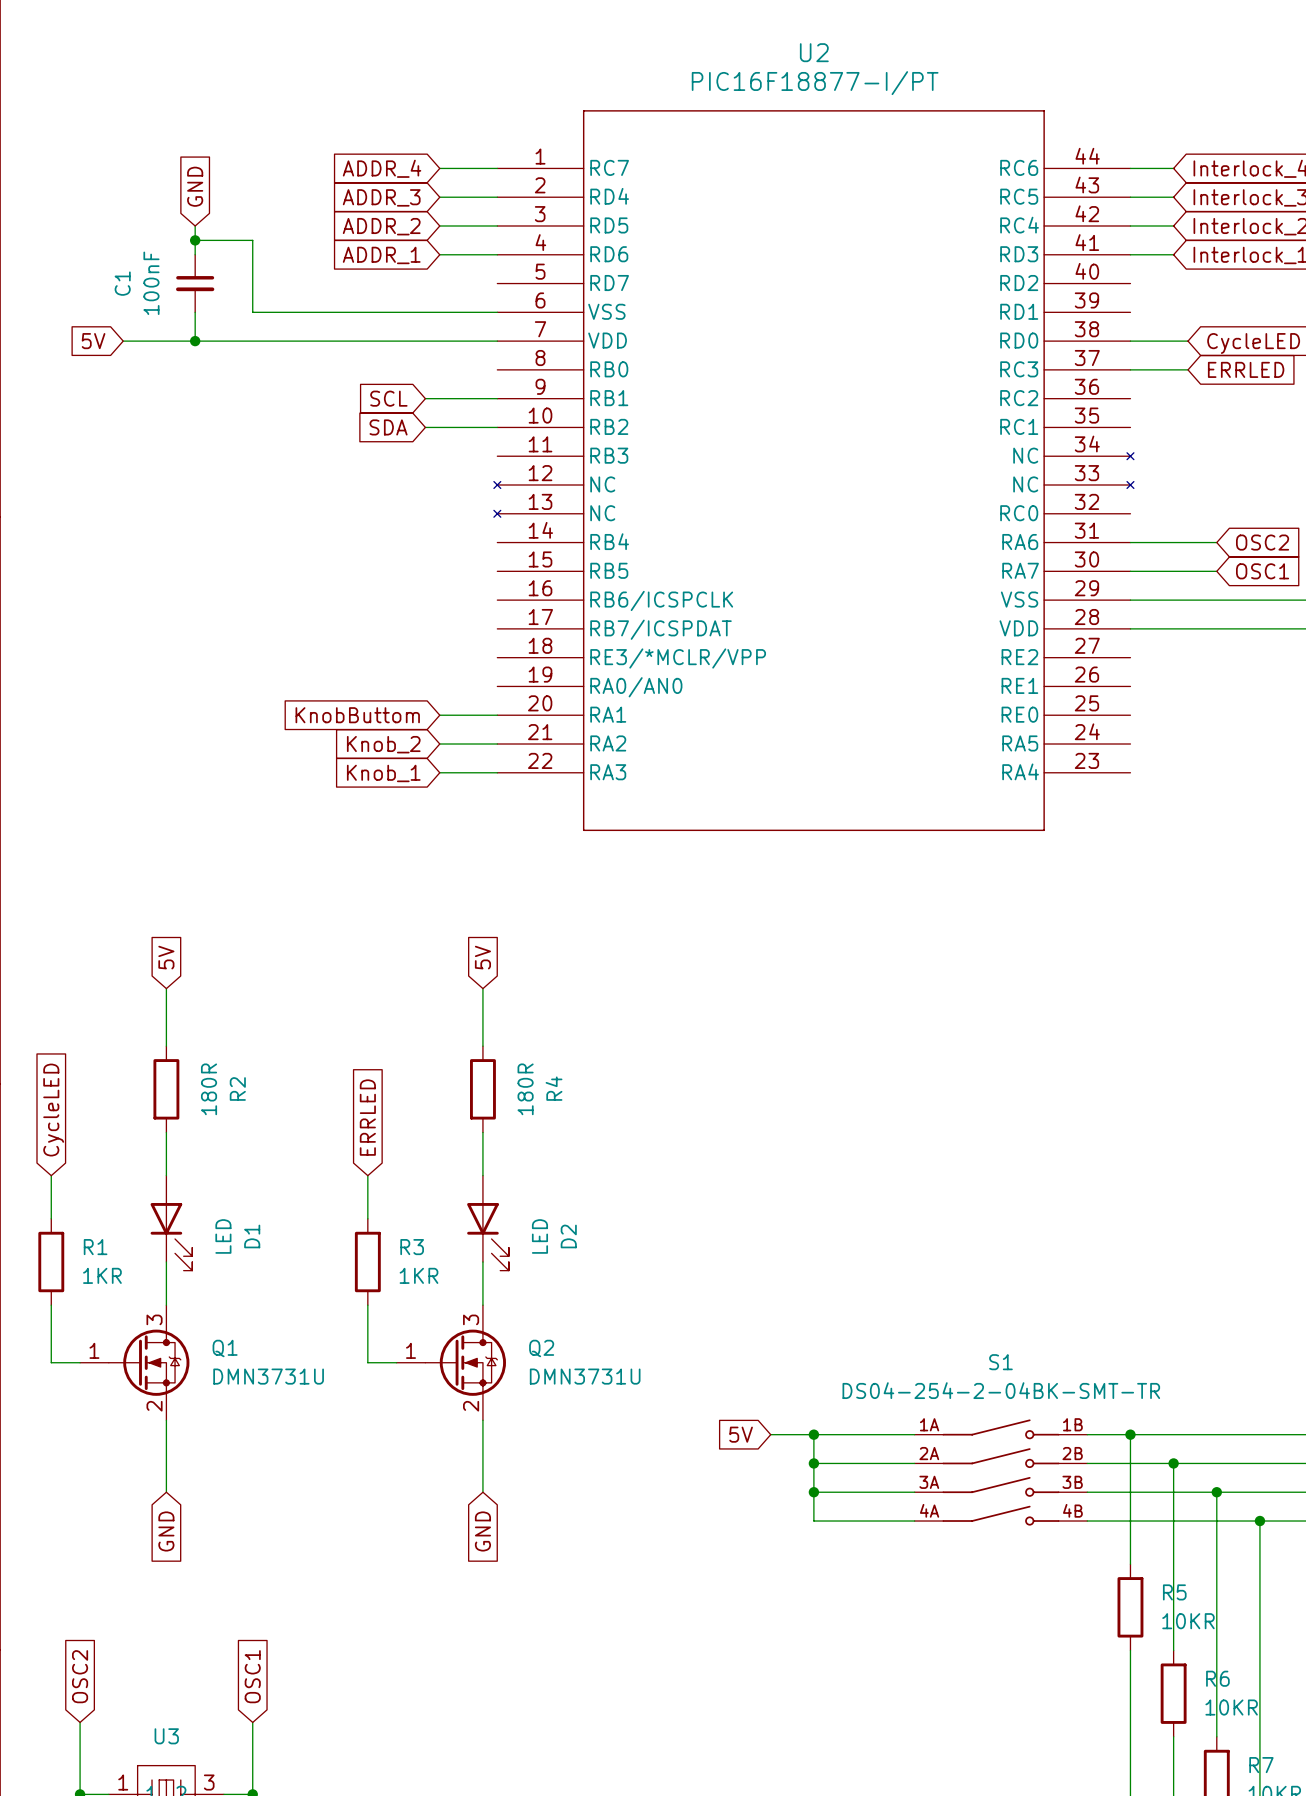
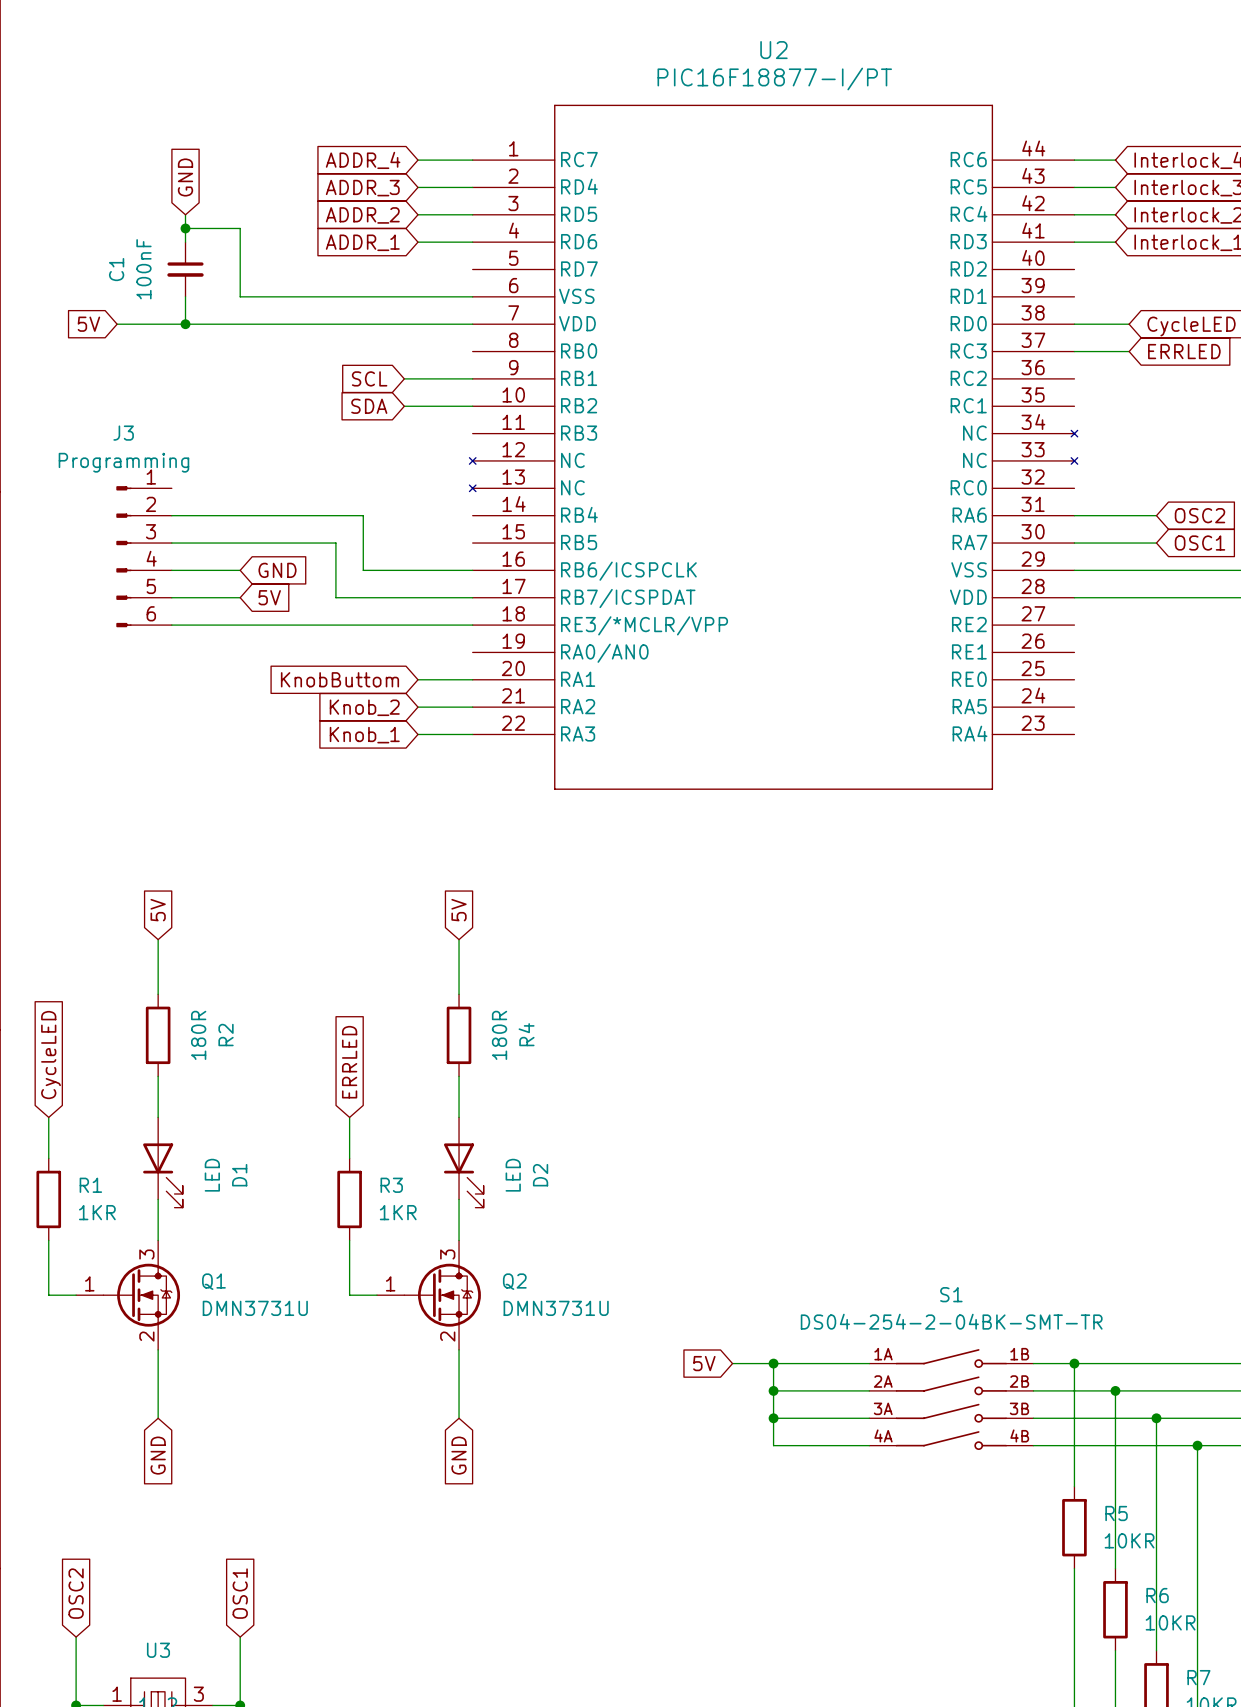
wire: none -> (171, 515) (363, 515) (363, 570) (472, 570)
wire: none -> (171, 543) (335, 543) (335, 597) (472, 597)
J3: none -> Programming (144, 556)
wire: none -> (171, 570) (240, 570)
global label: none -> GND (277, 570)
wire: none -> (171, 597) (240, 597)
global label: none -> 5V (269, 597)
wire: none -> (171, 625) (472, 625)

